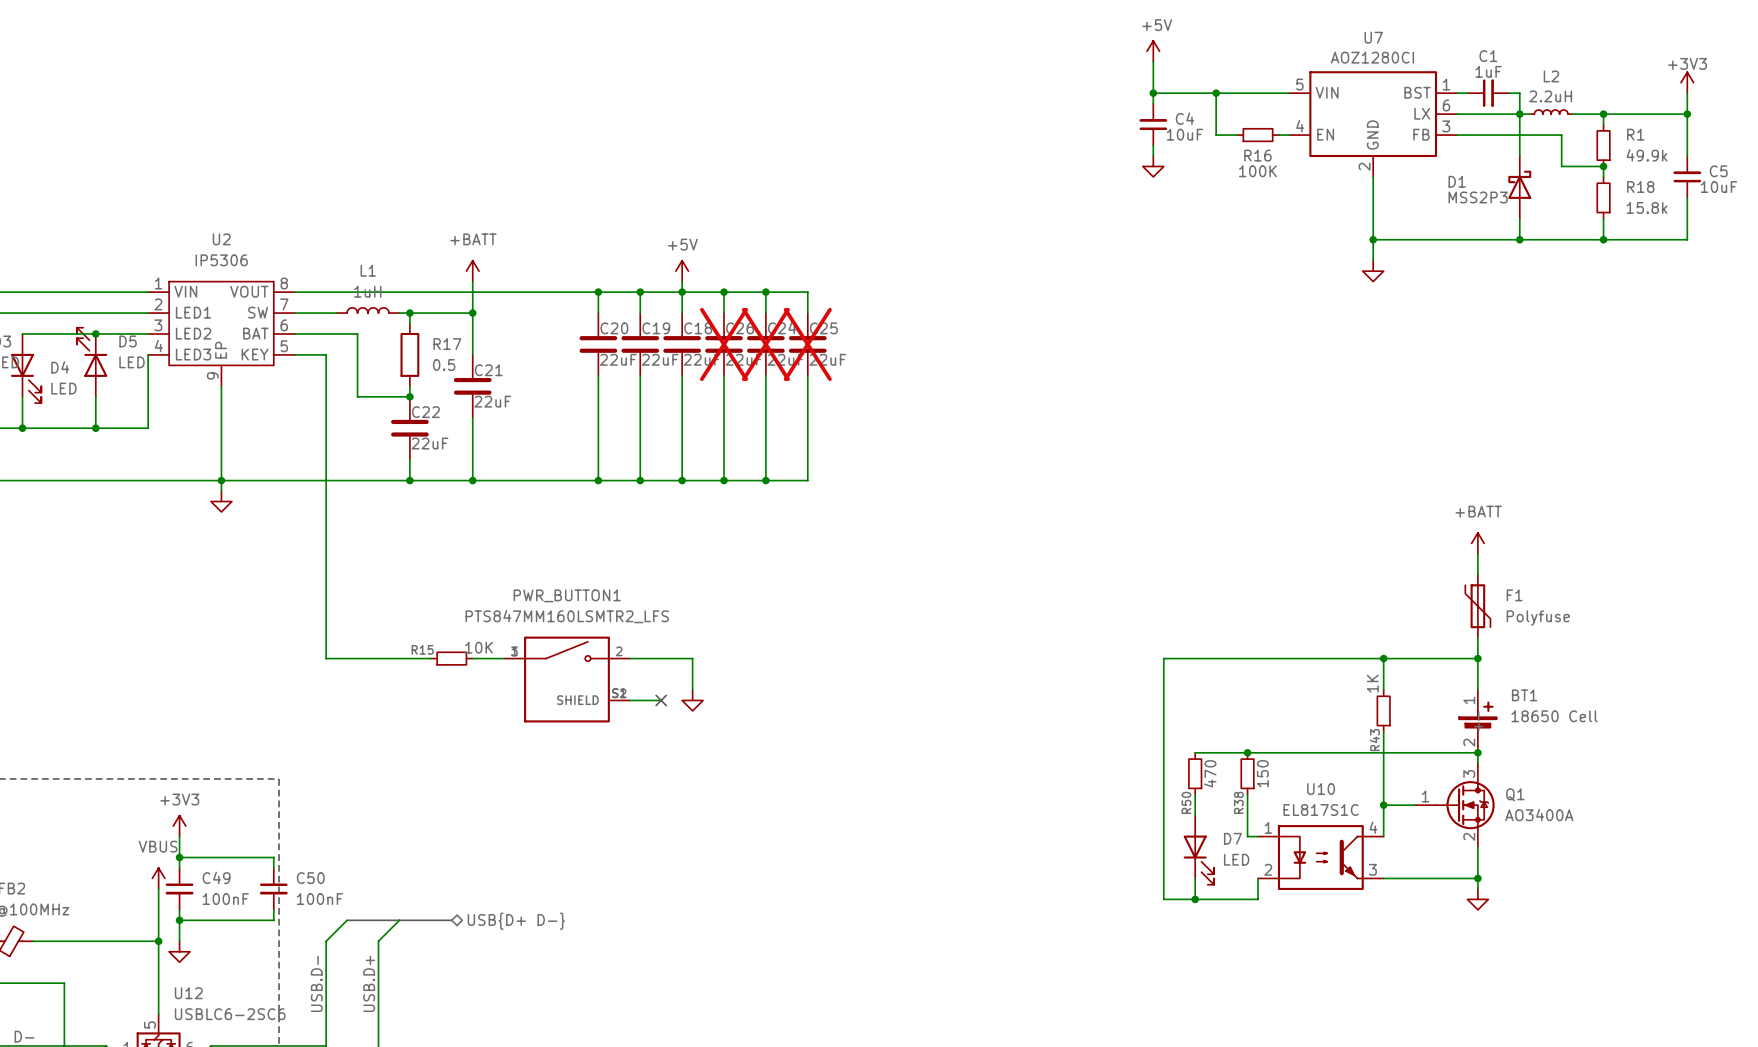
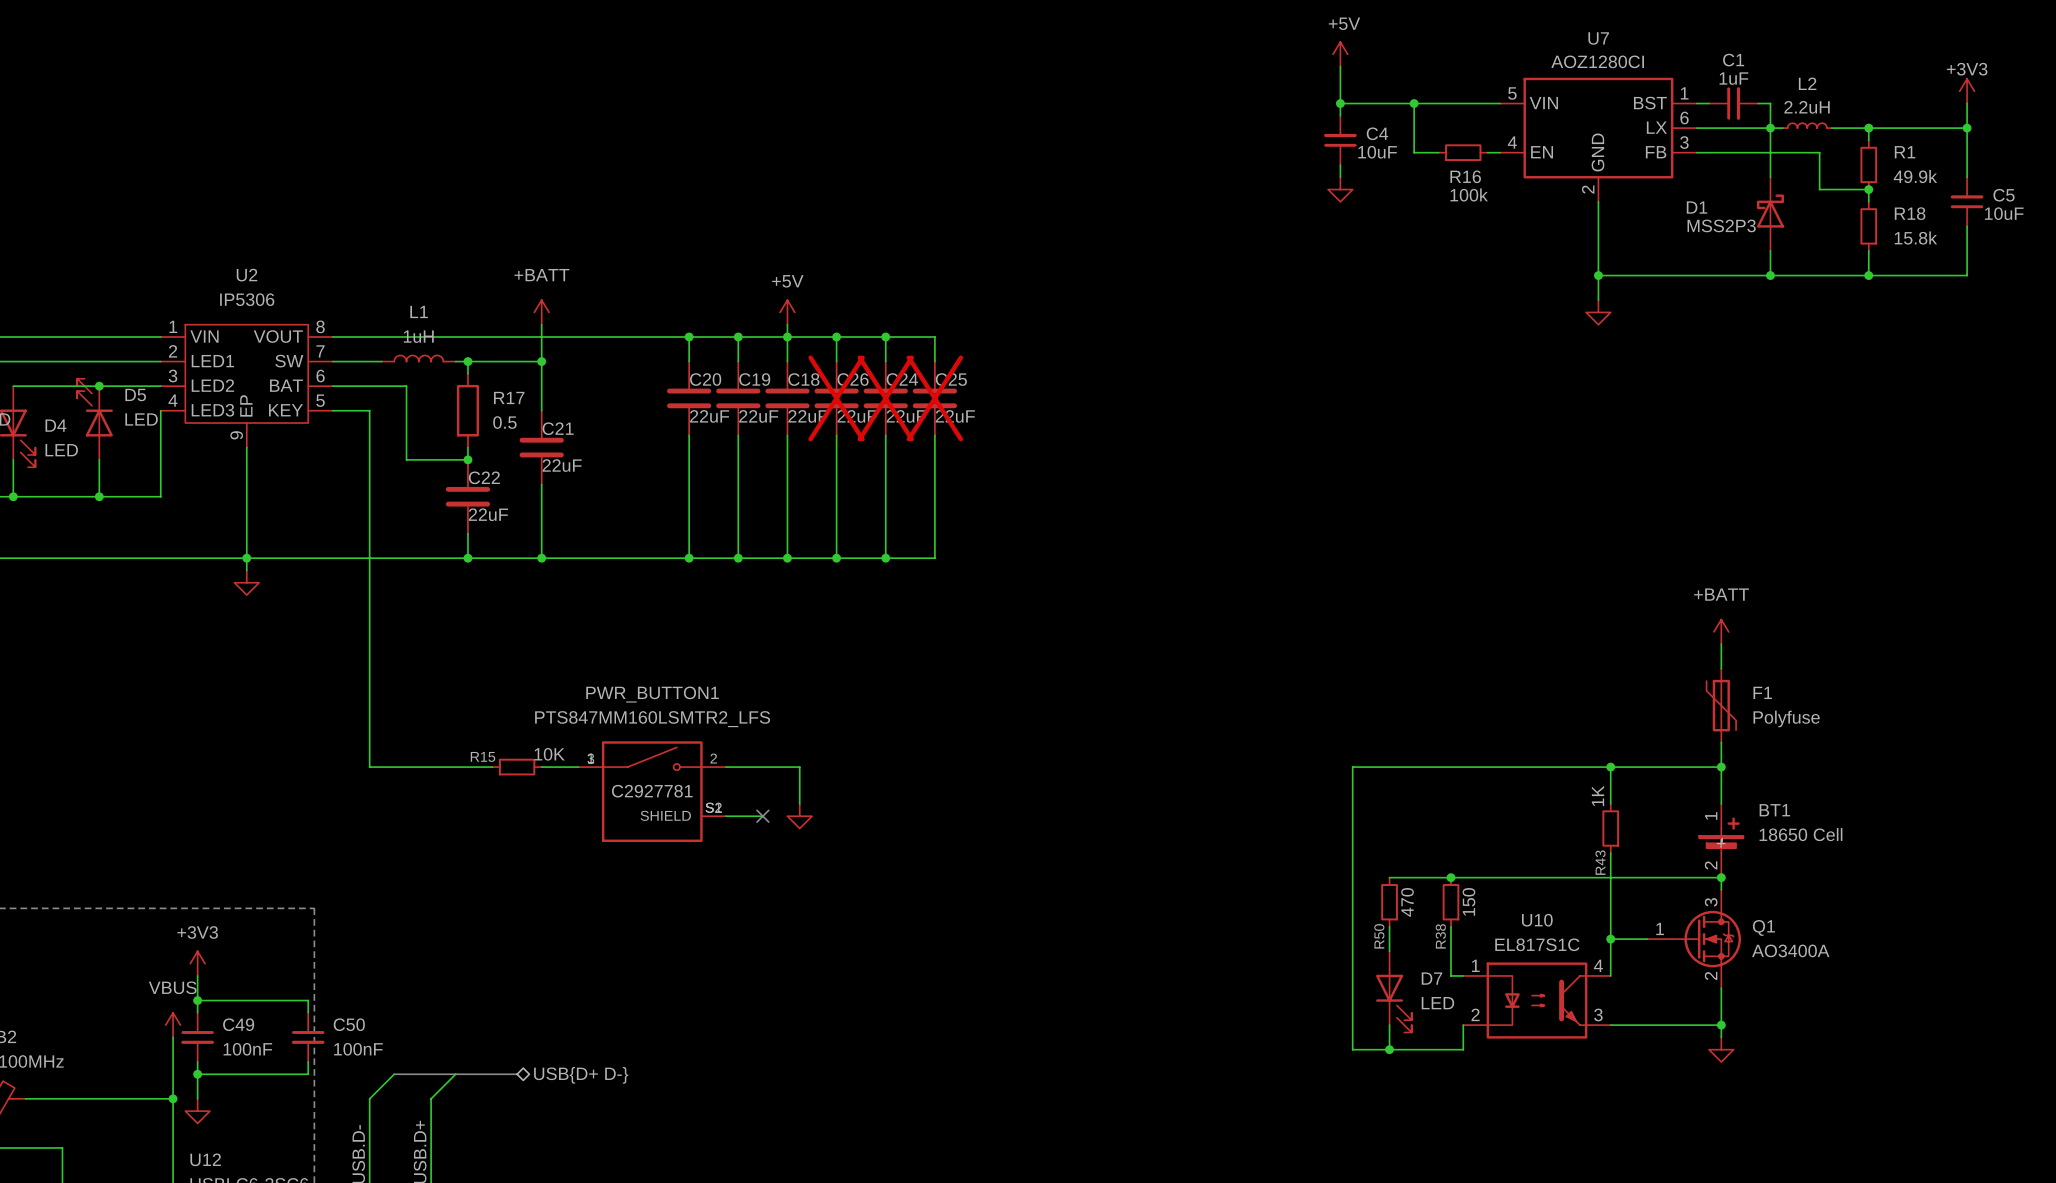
R16 value: 100K (1257, 171) -> 100k (1469, 194)
PWR_BUTTON1 text: none -> C2927781 (652, 791)

